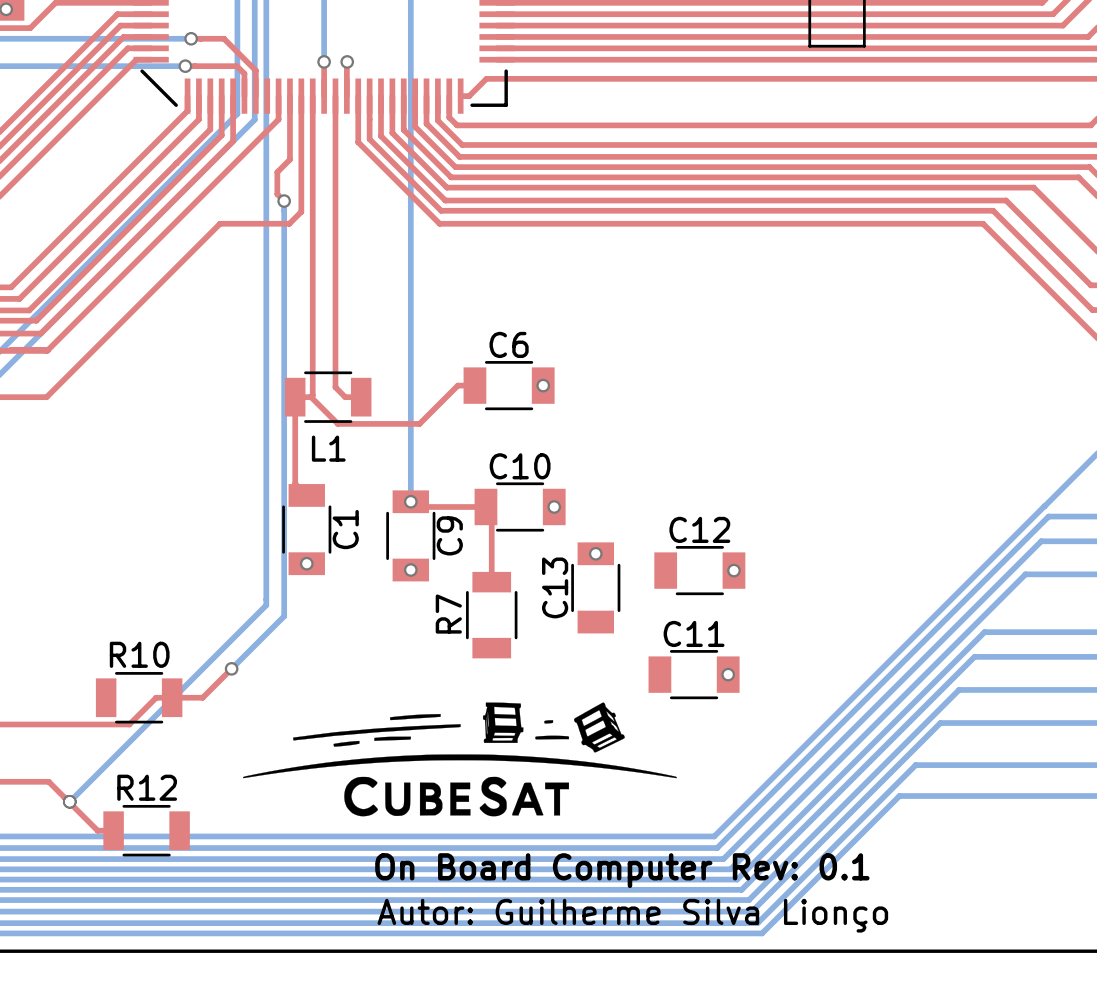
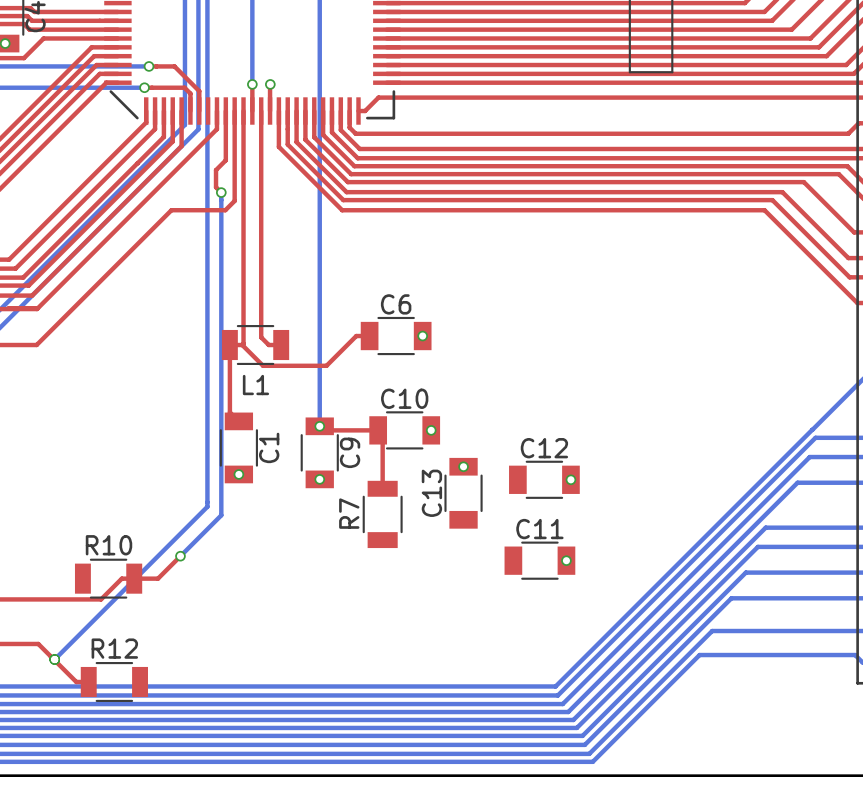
drawing: [243, 702, 677, 817] -> none
text: On Board Computer Rev: 0.1 (622, 870) -> none
text: Autor: Guilherme Silva Lionço (632, 915) -> none

